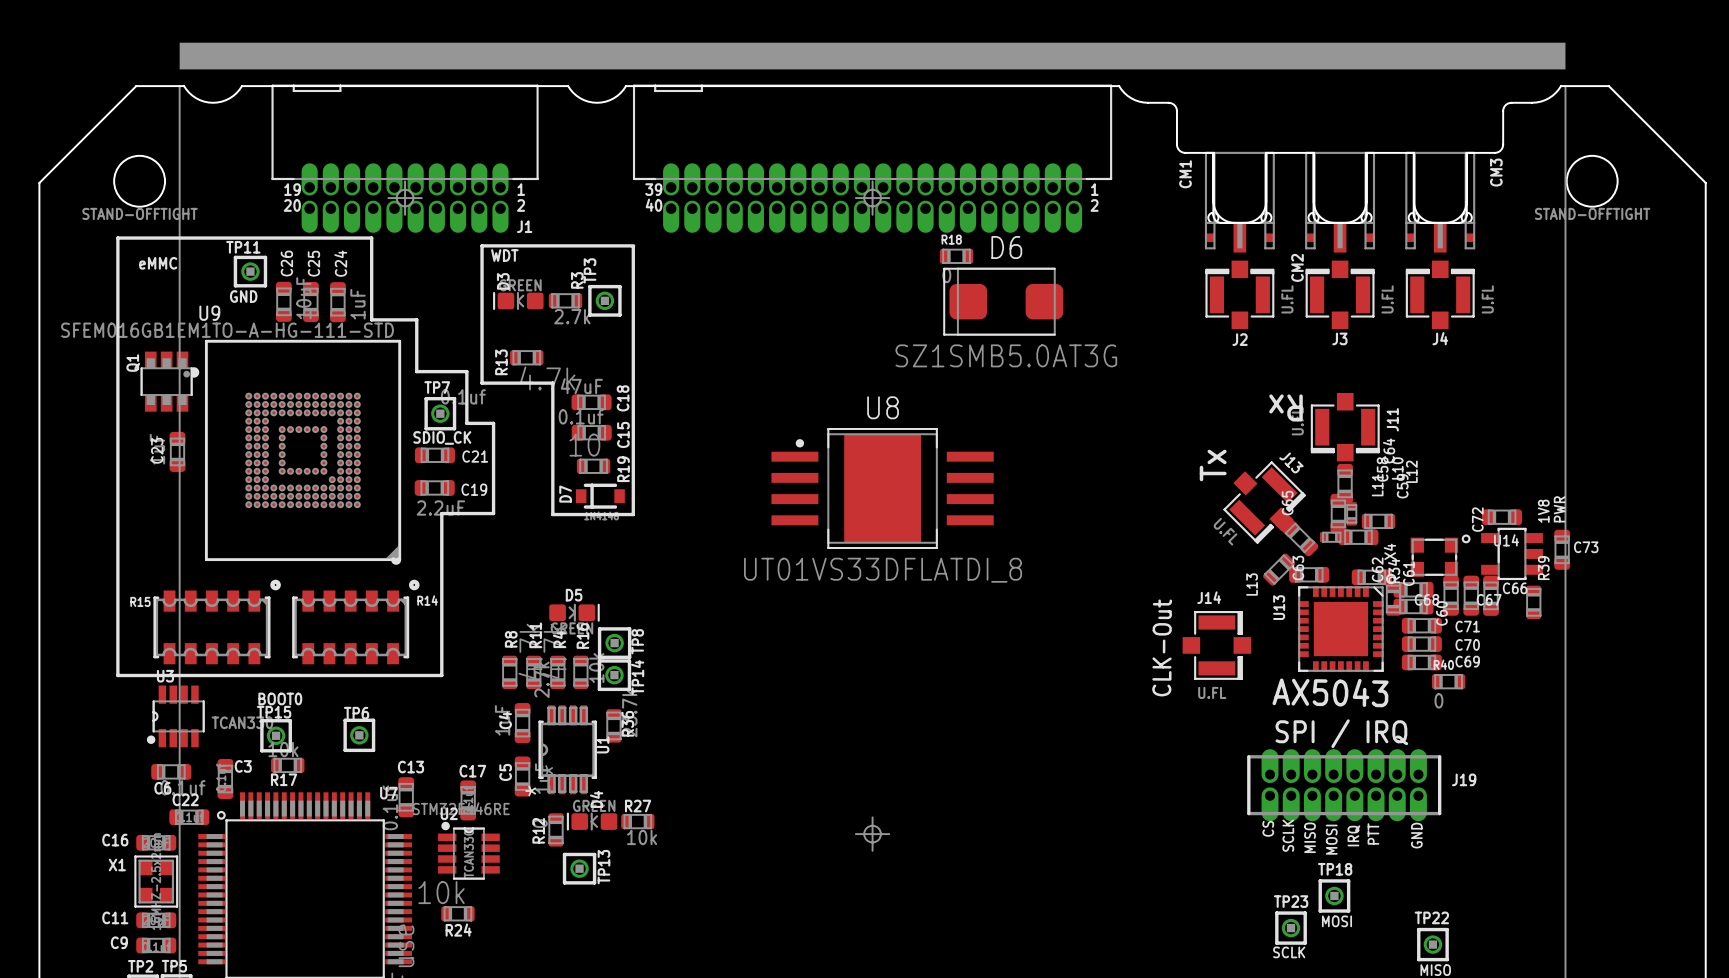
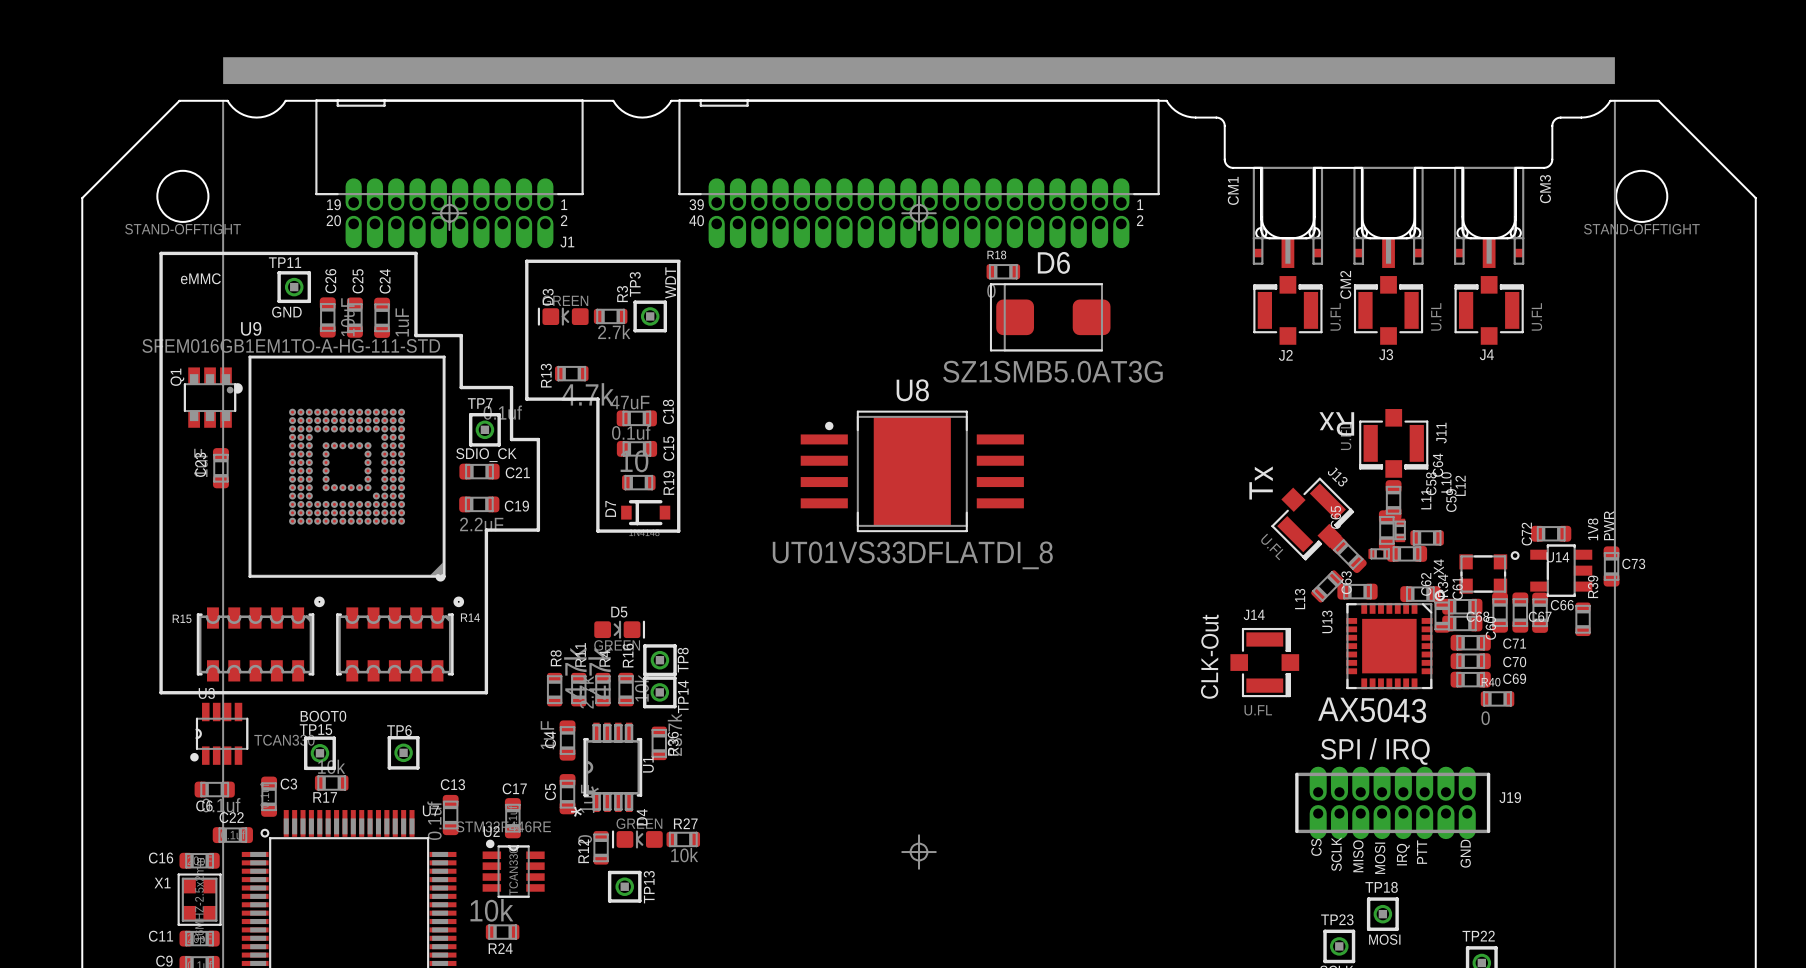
text rotation: 0° (504, 255) -> 90° counterclockwise (670, 282)
text position: WDT (504, 255) -> WDT (670, 282)
U8 position: (882, 488) -> (912, 471)

